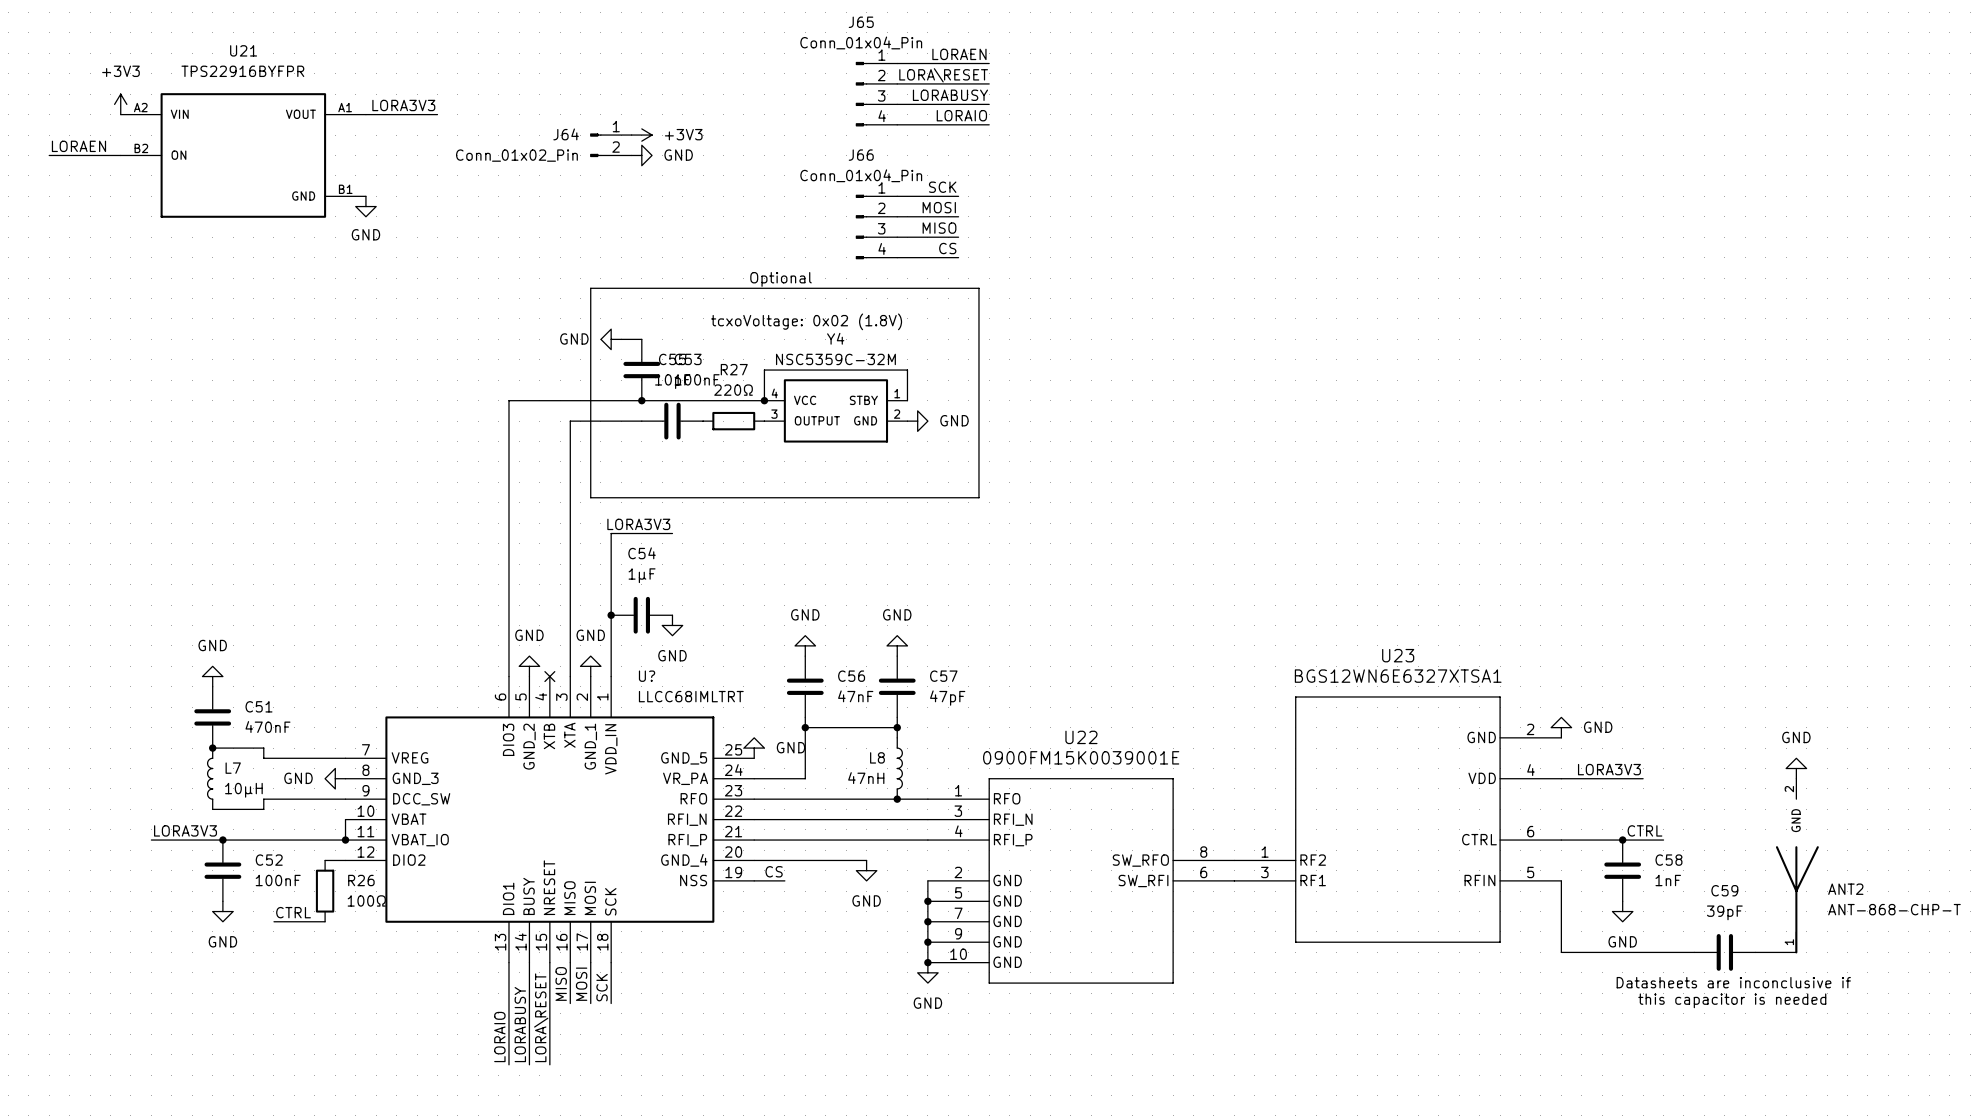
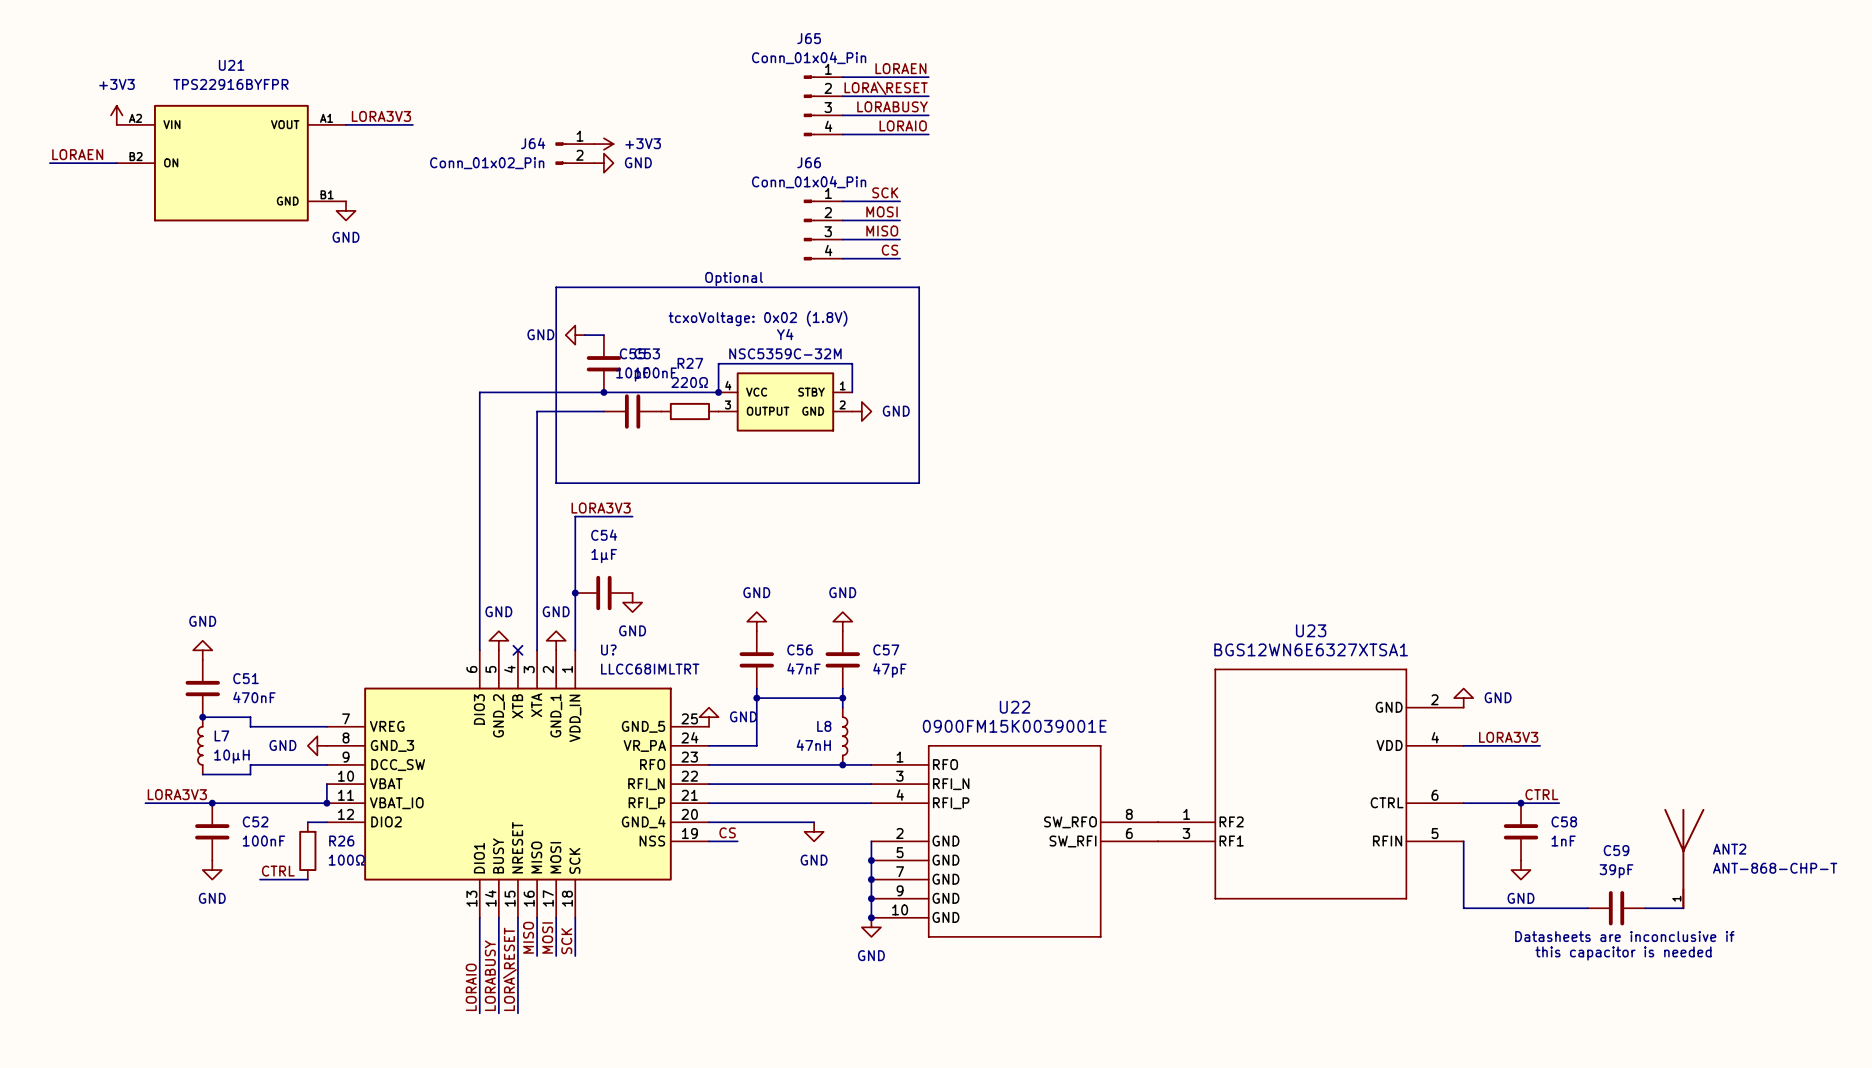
power symbol: GND (1796, 768) -> none
ANT2 symbol: [1775, 778, 1819, 954] -> [1664, 808, 1705, 910]

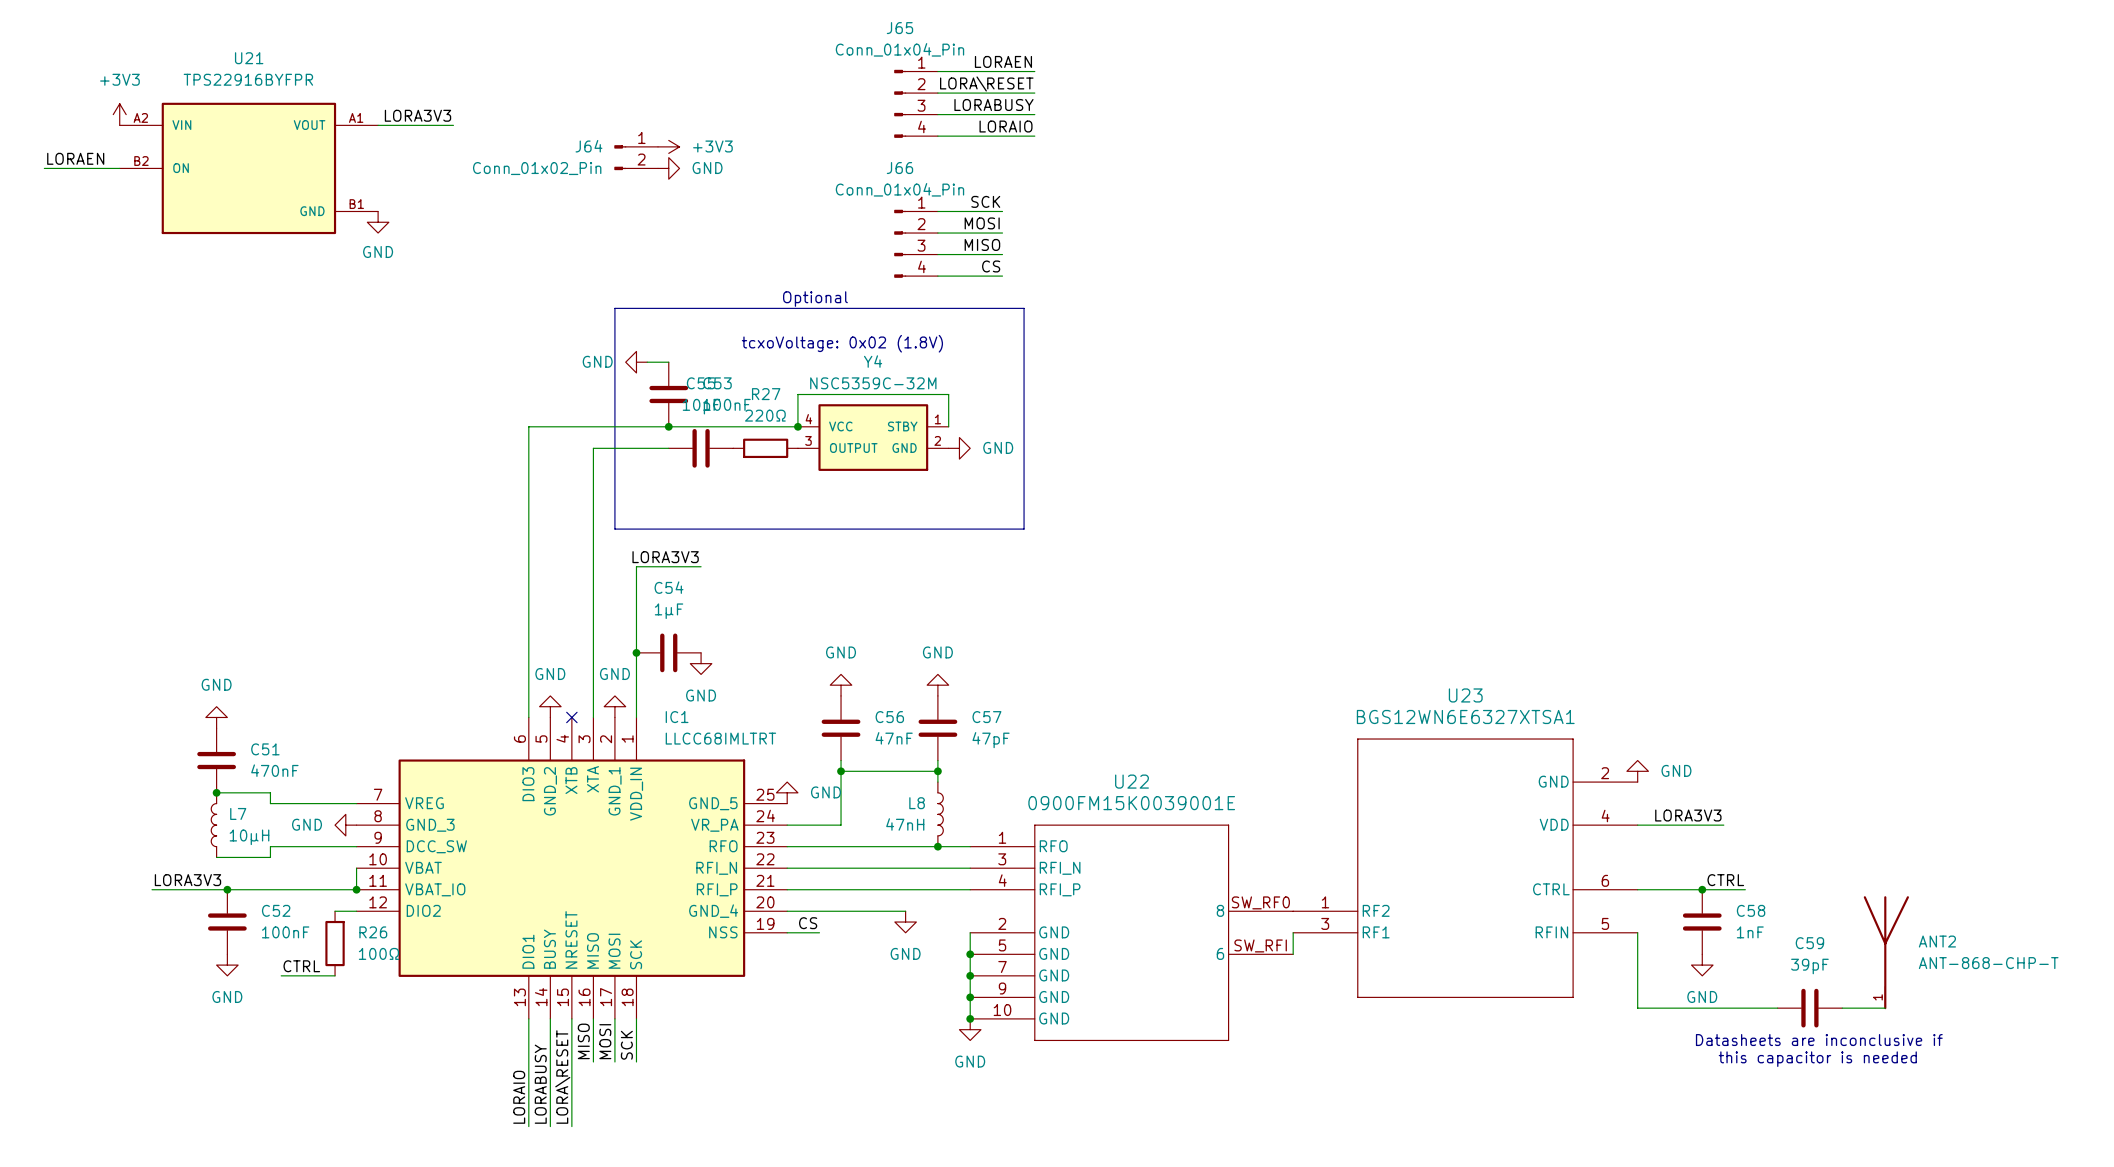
U? name: U? (608, 649) -> IC1 (677, 717)
U22 symbol: [871, 745, 1159, 938] -> [970, 824, 1294, 1041]
wire: none -> (1293, 932) (1293, 954)

